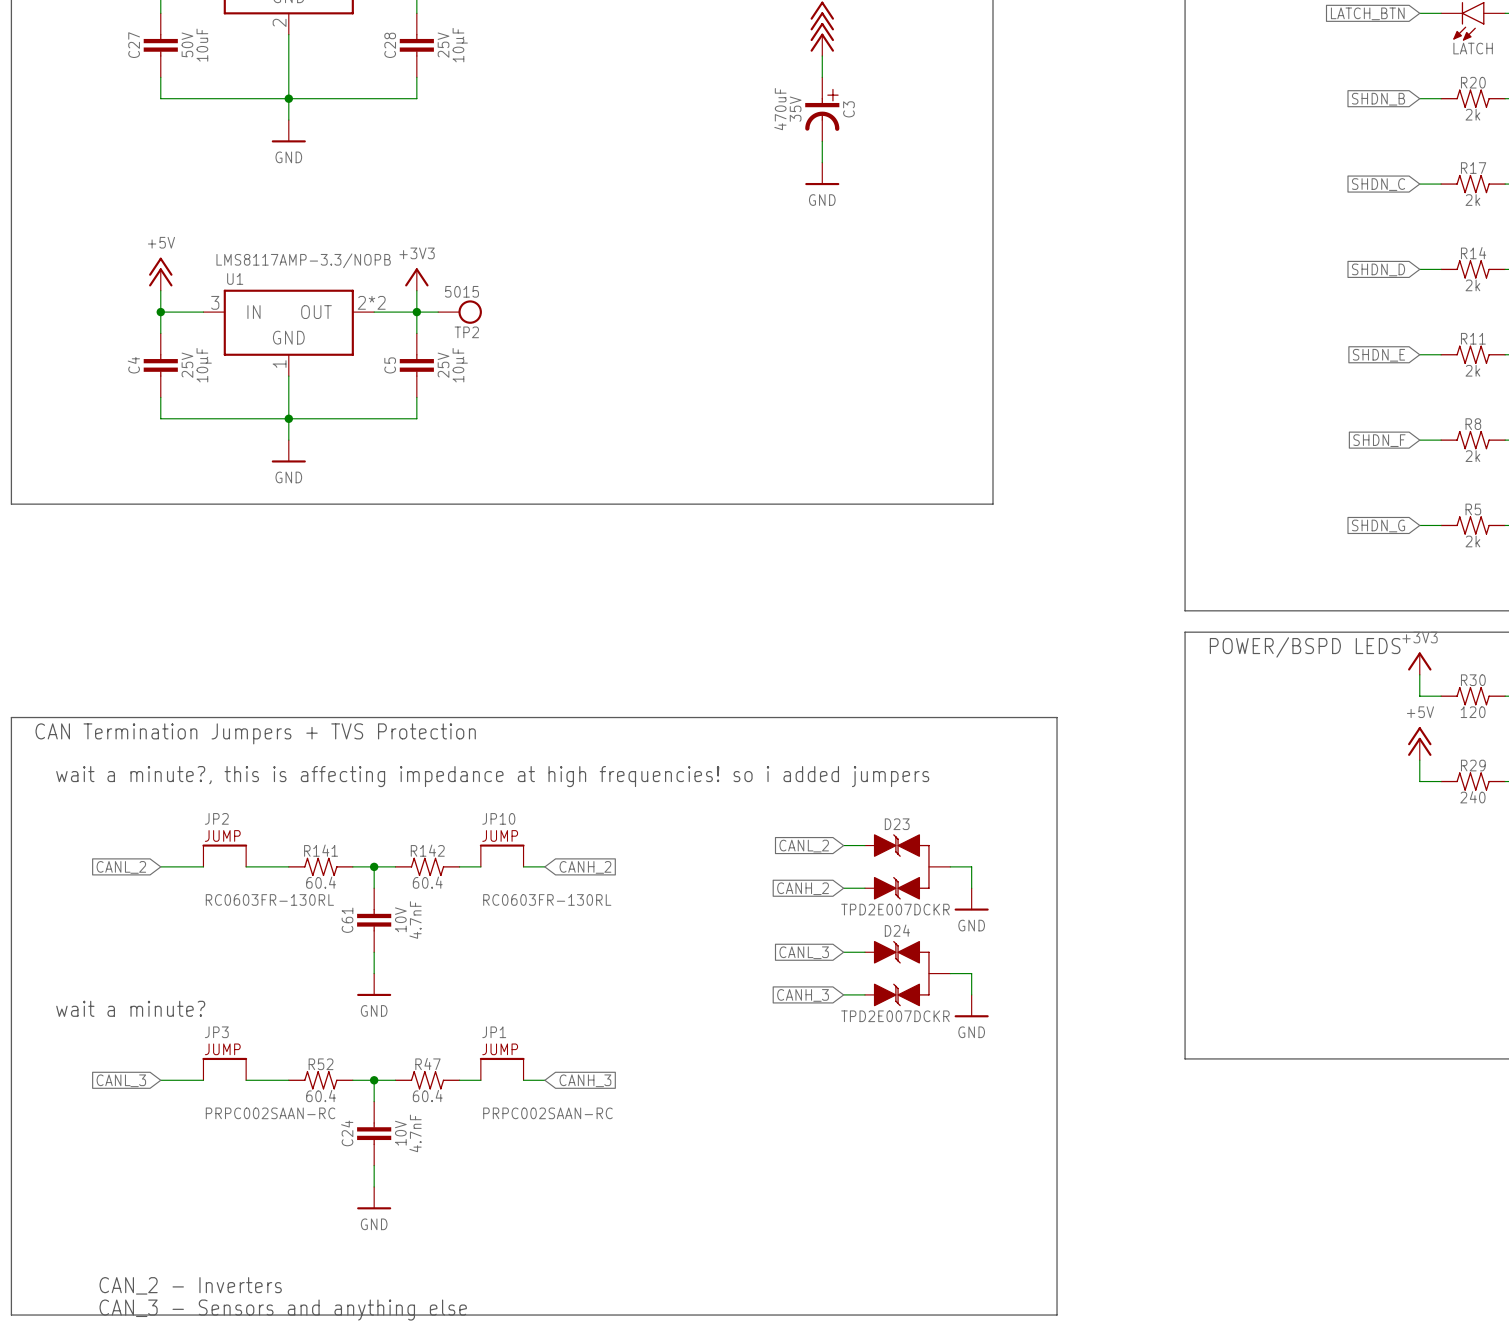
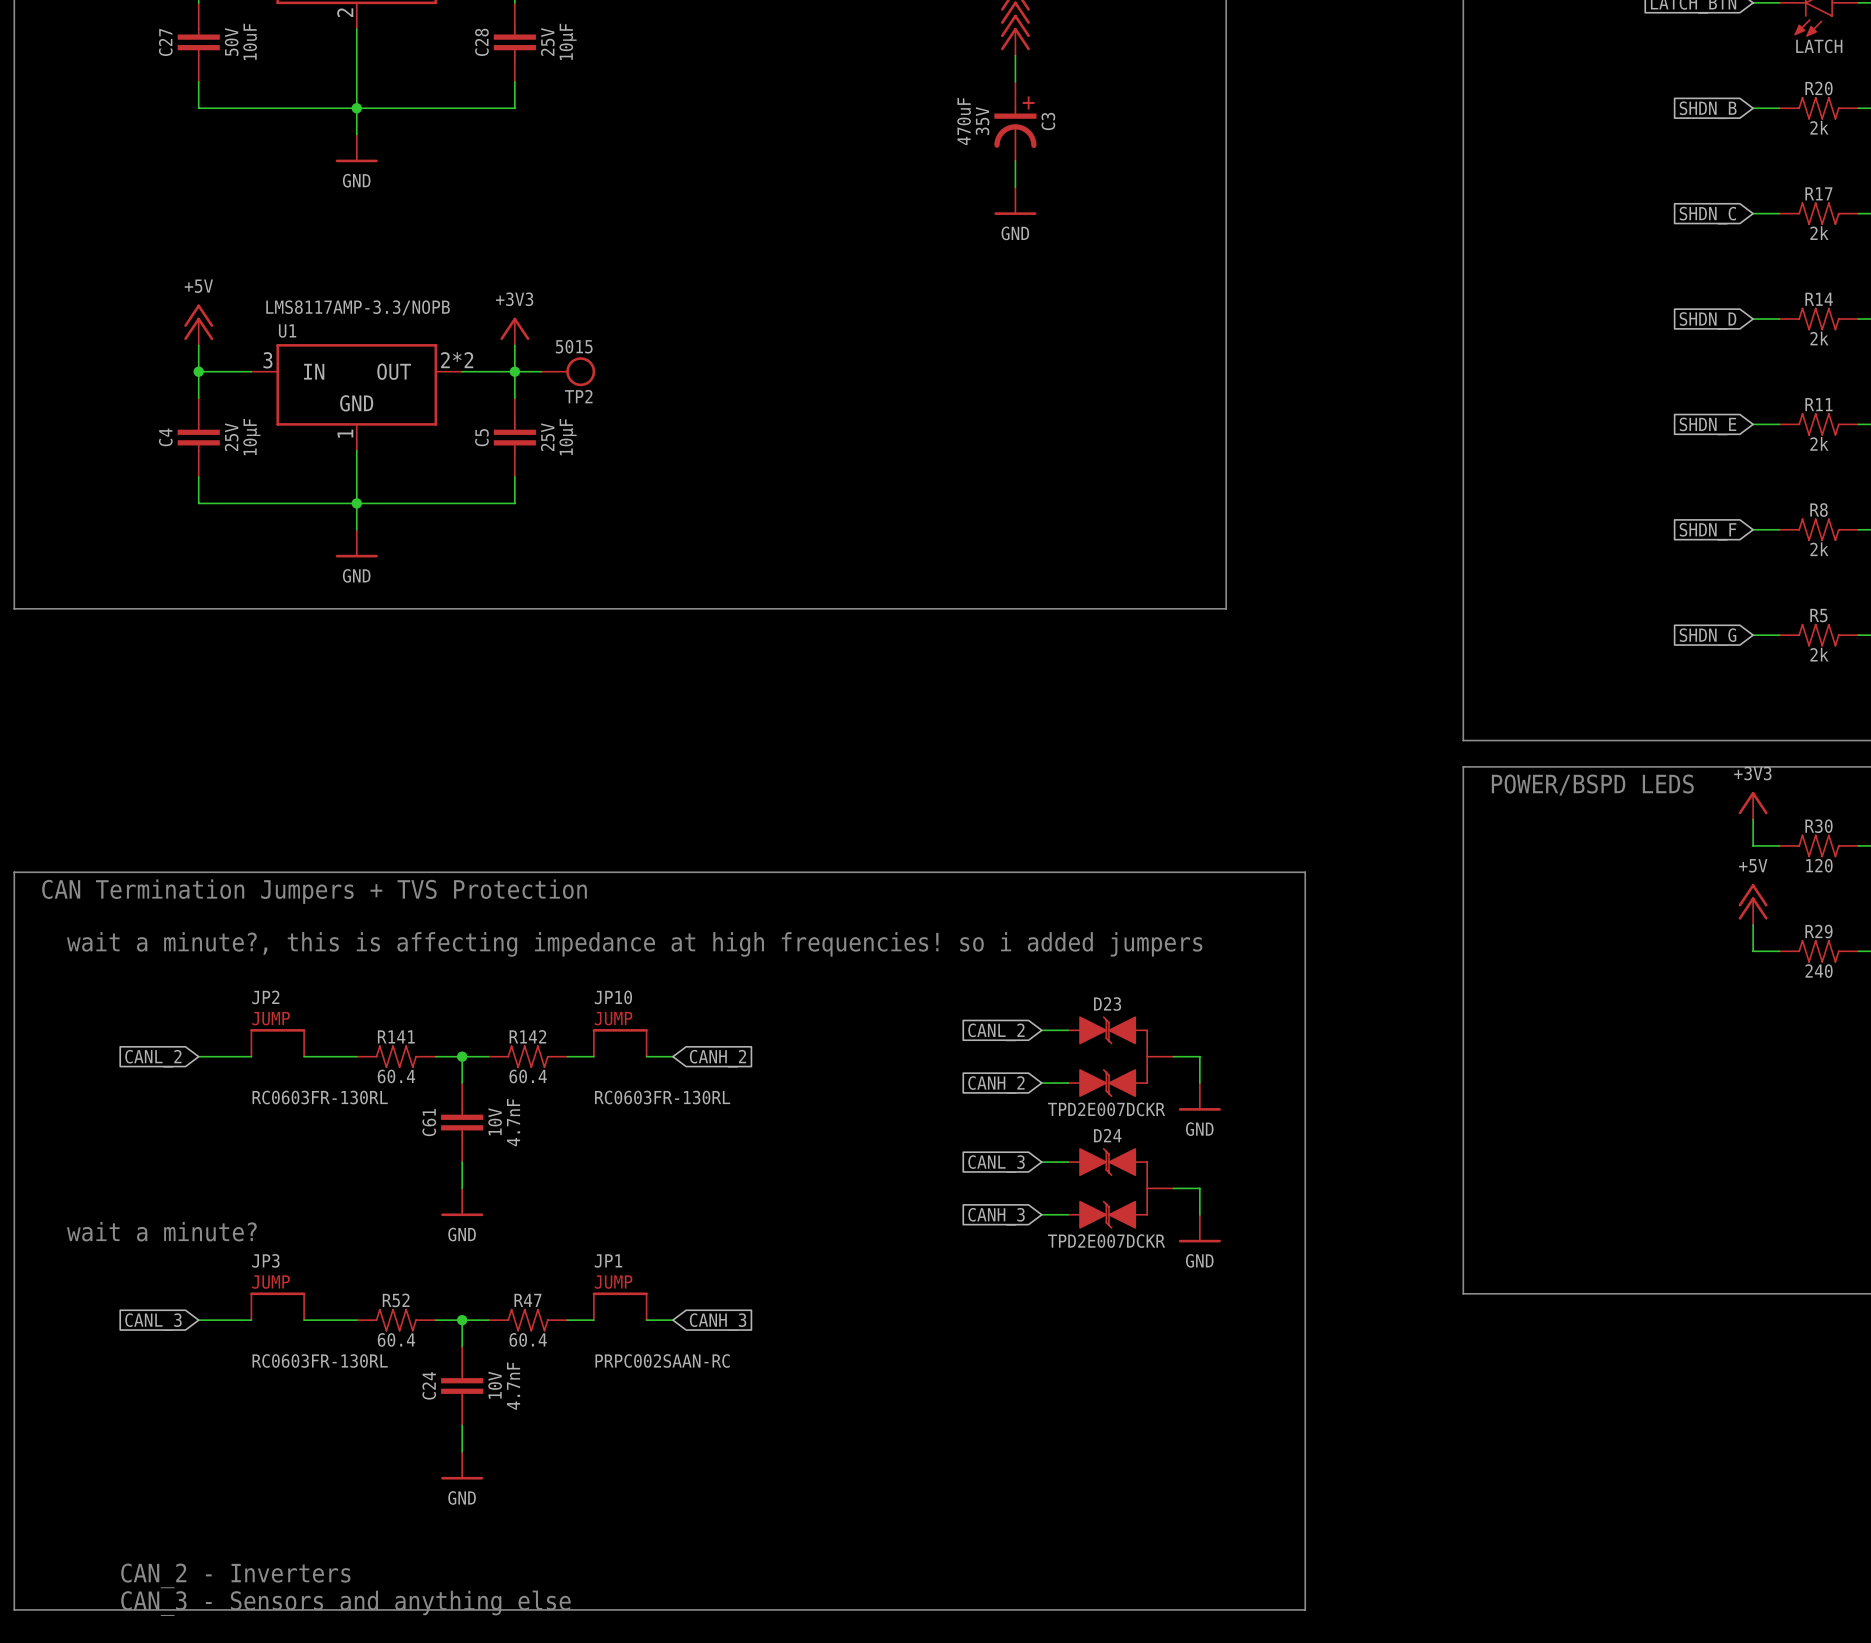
JP3 text: PRPC002SAAN-RC (270, 1113) -> RC0603FR-130RL (320, 1360)

